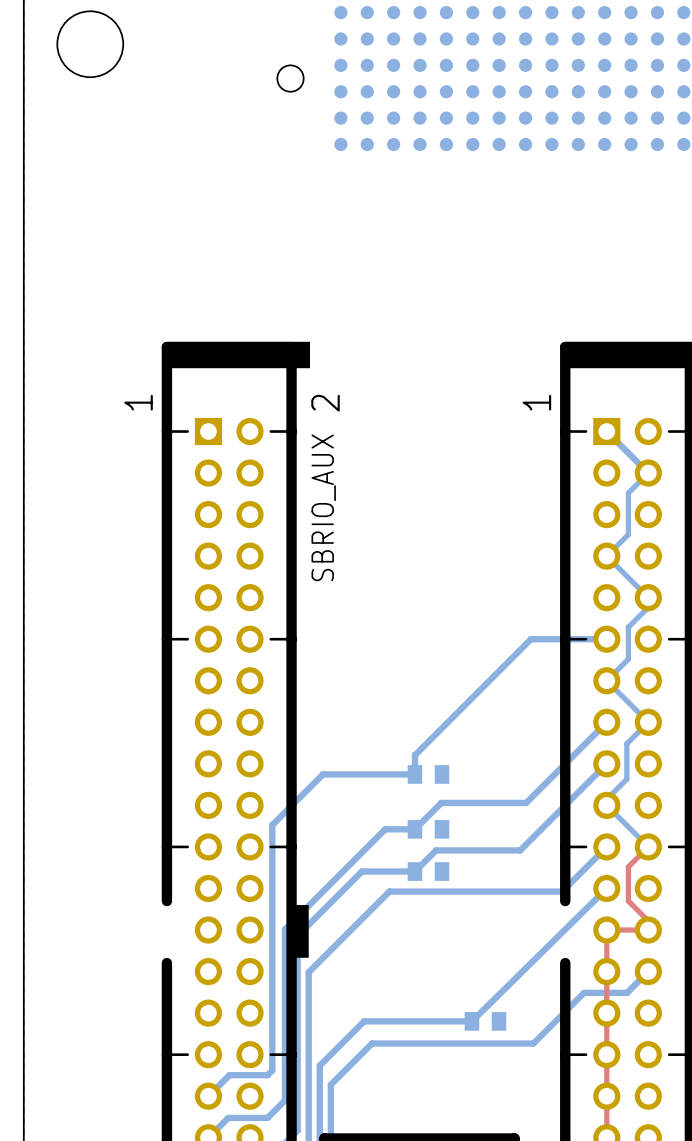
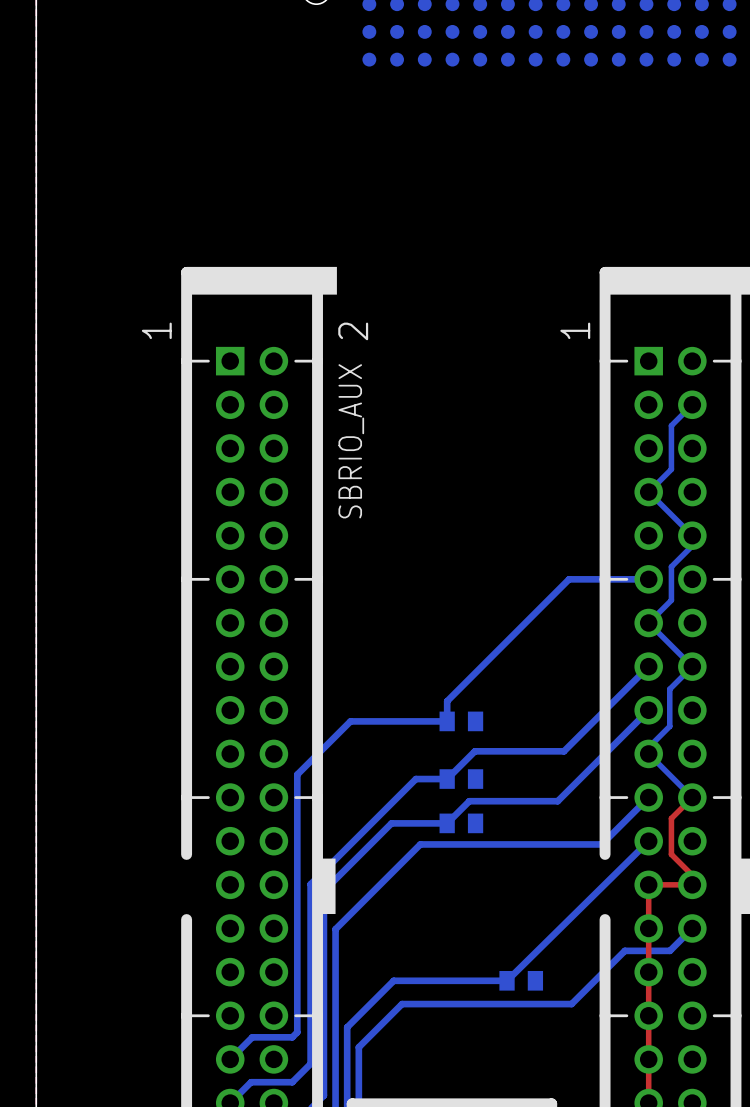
bottom track: (606, 431) (648, 473) -> none

